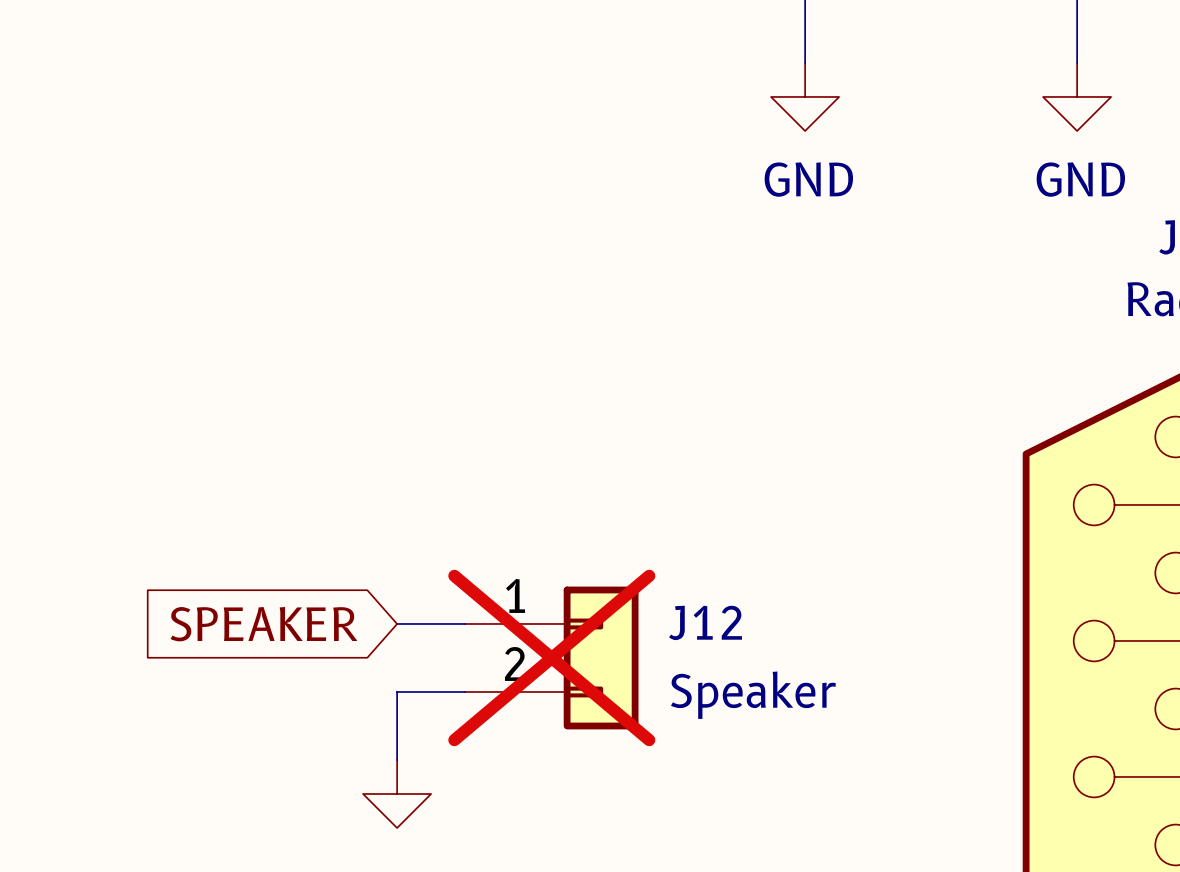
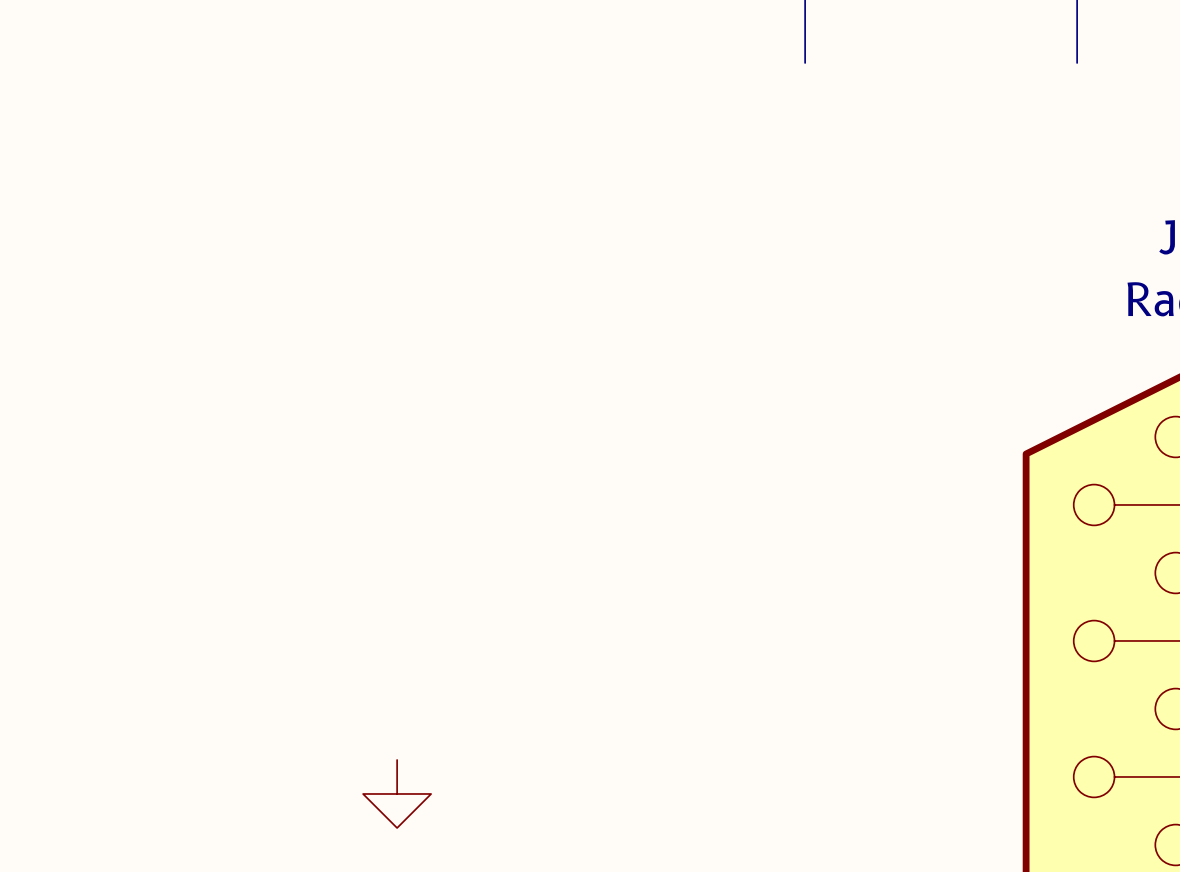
power symbol: GND (805, 96) -> none
power symbol: GND (1077, 96) -> none
wire: (397, 623) (465, 623) -> none
global label: SPEAKER (263, 624) -> none
J12: Speaker (551, 657) -> none
wire: (465, 691) (397, 691) (397, 759) -> none

